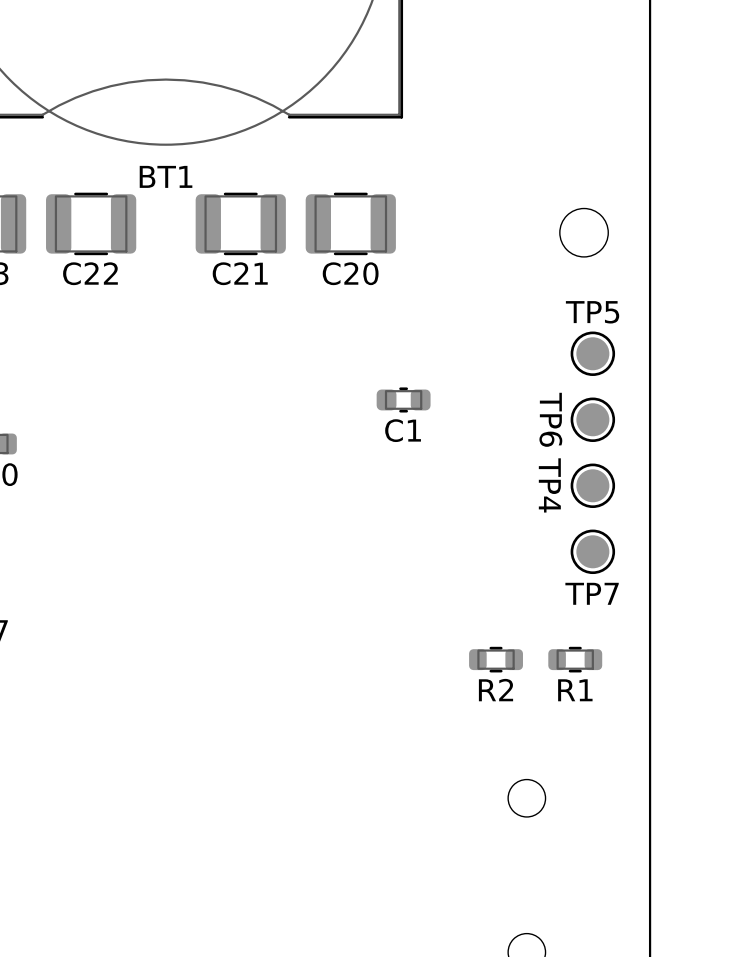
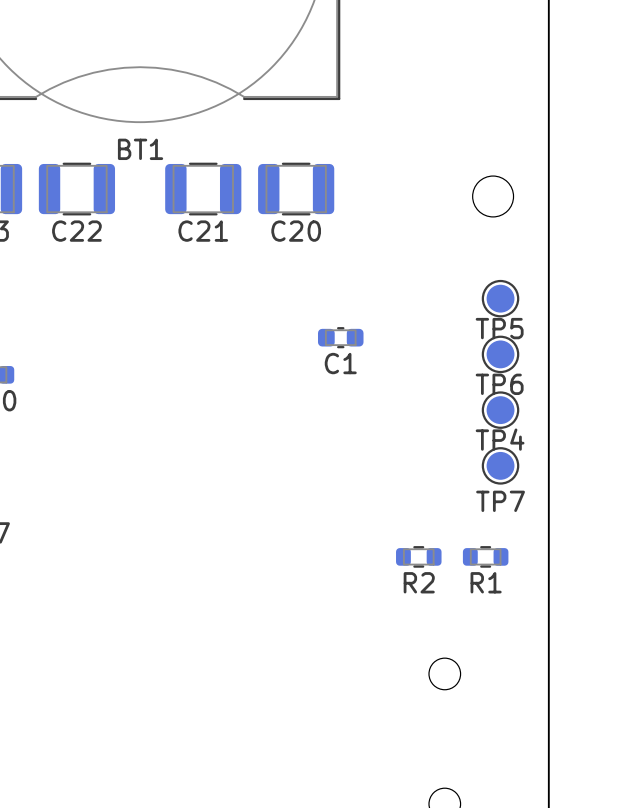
TP5 name position: TP5 (592, 312) -> TP5 (499, 328)
TP6 name rotation: 0° (550, 419) -> 90° counterclockwise (499, 384)
TP4 name rotation: 0° (549, 485) -> 90° counterclockwise (500, 439)

